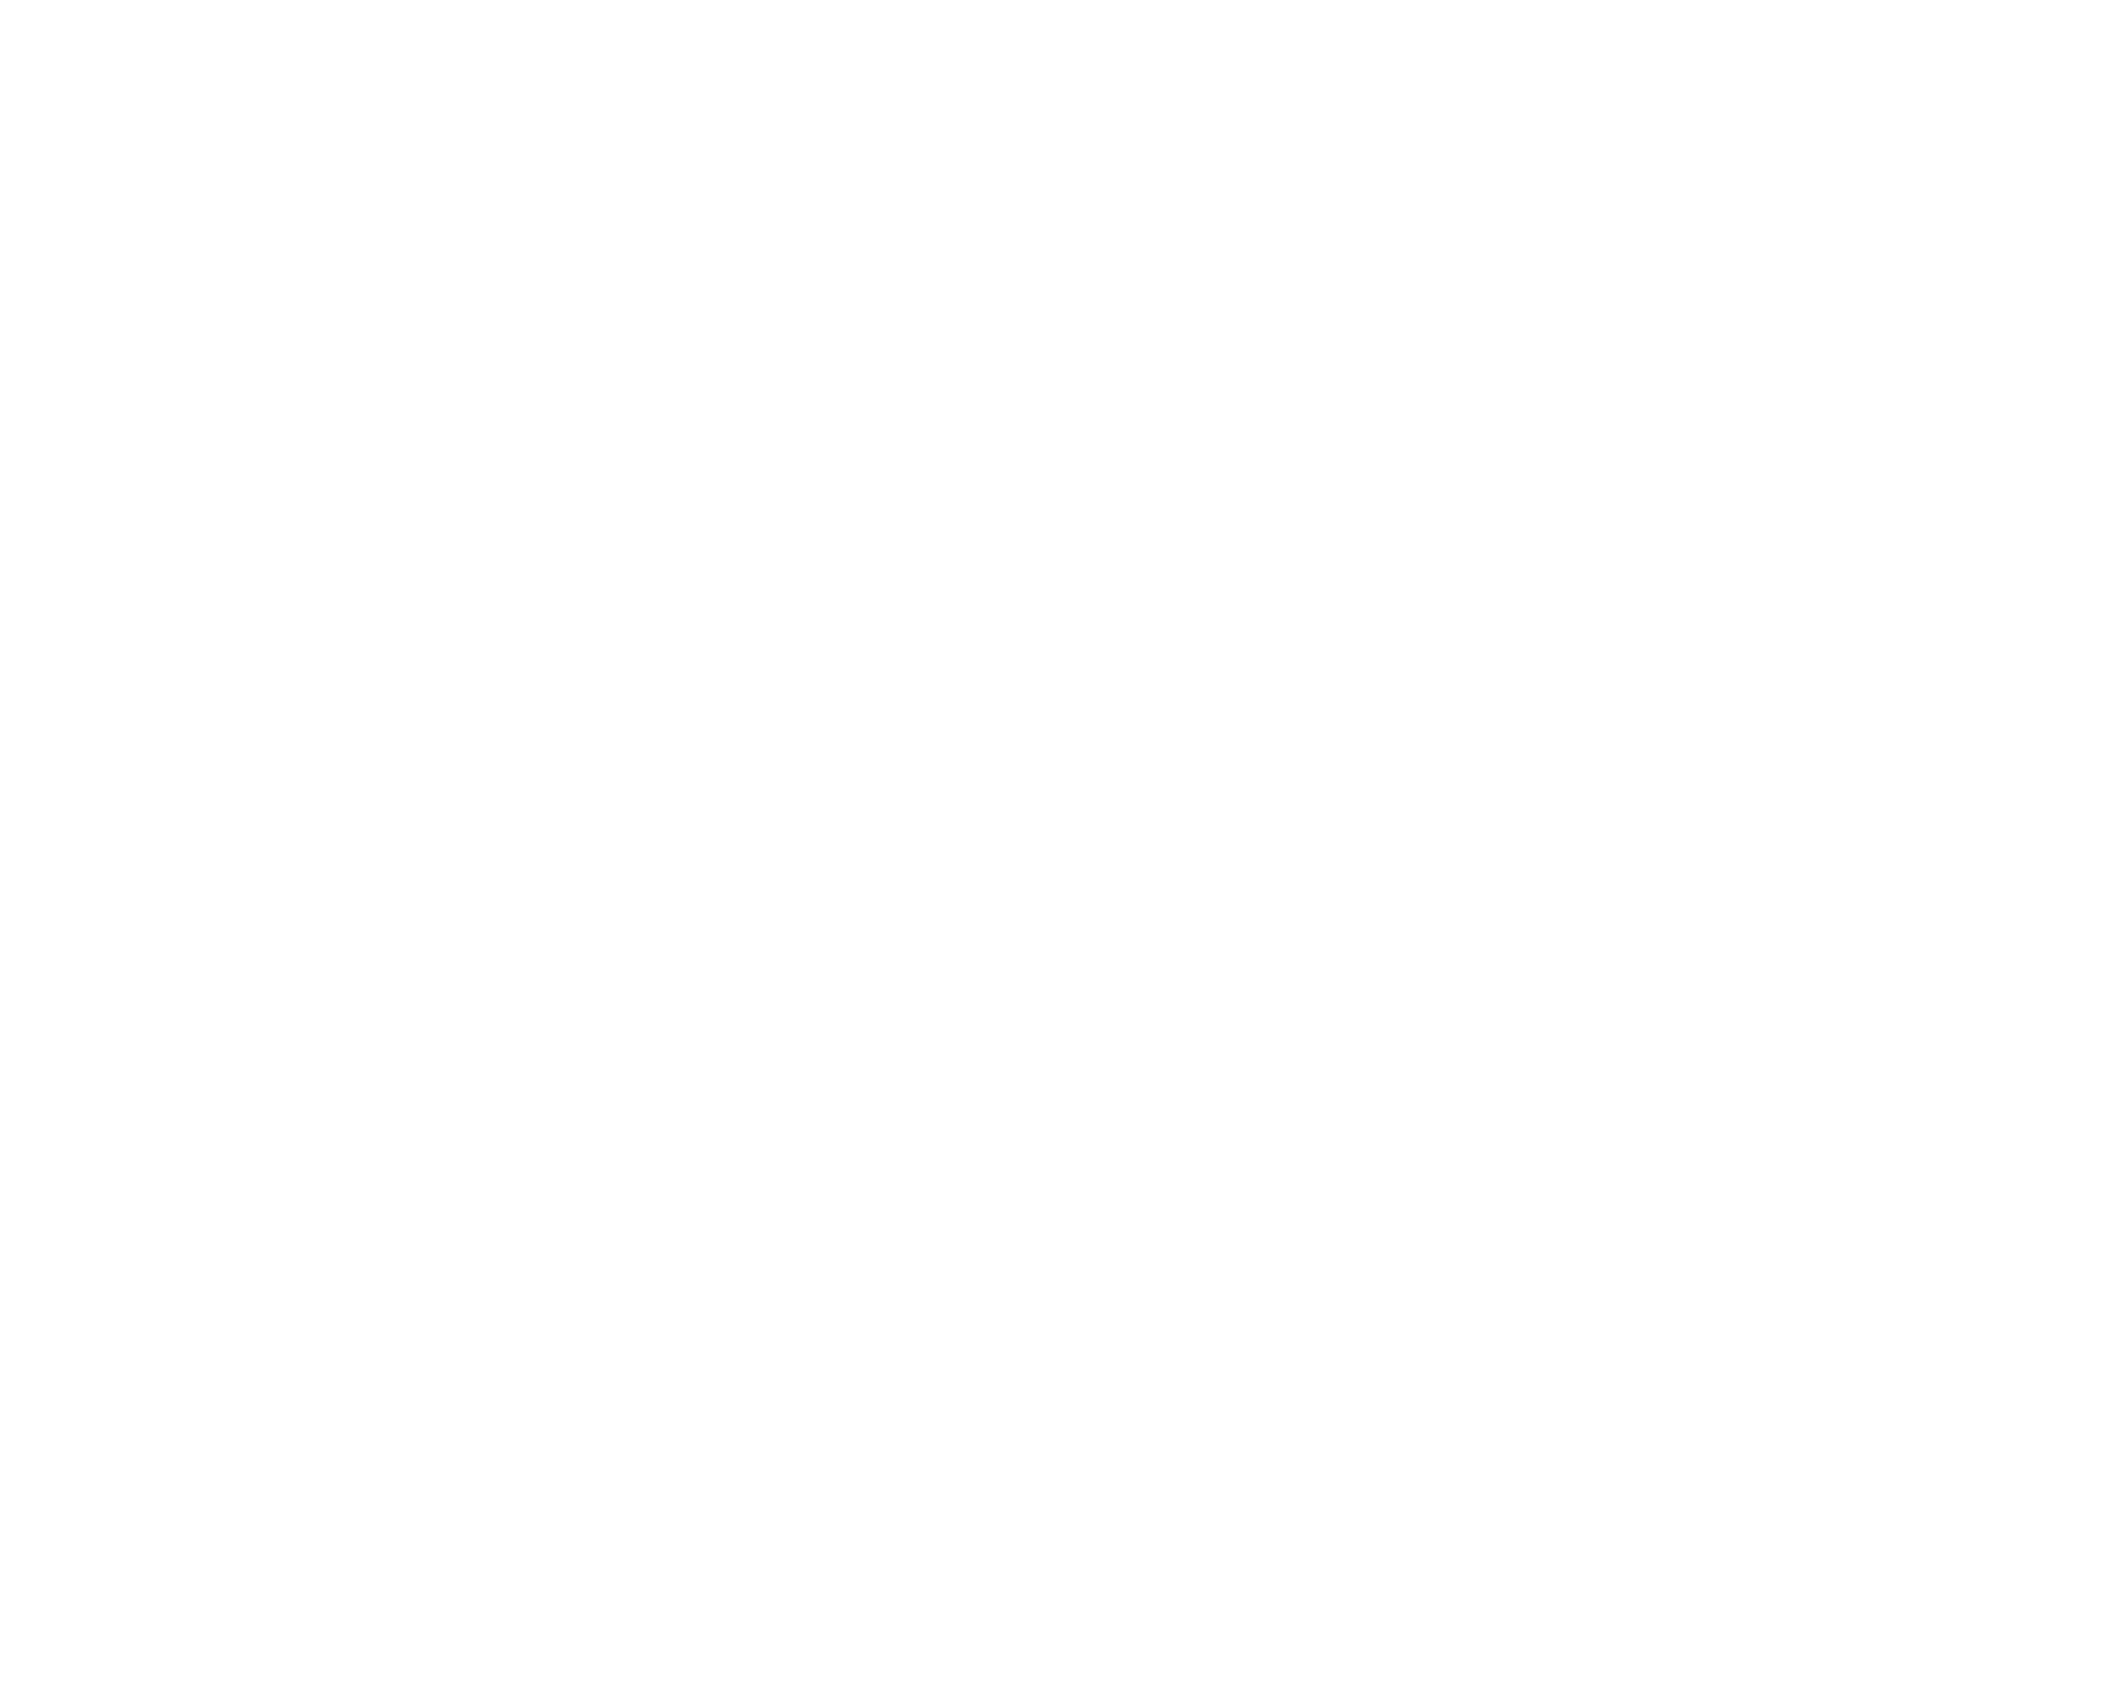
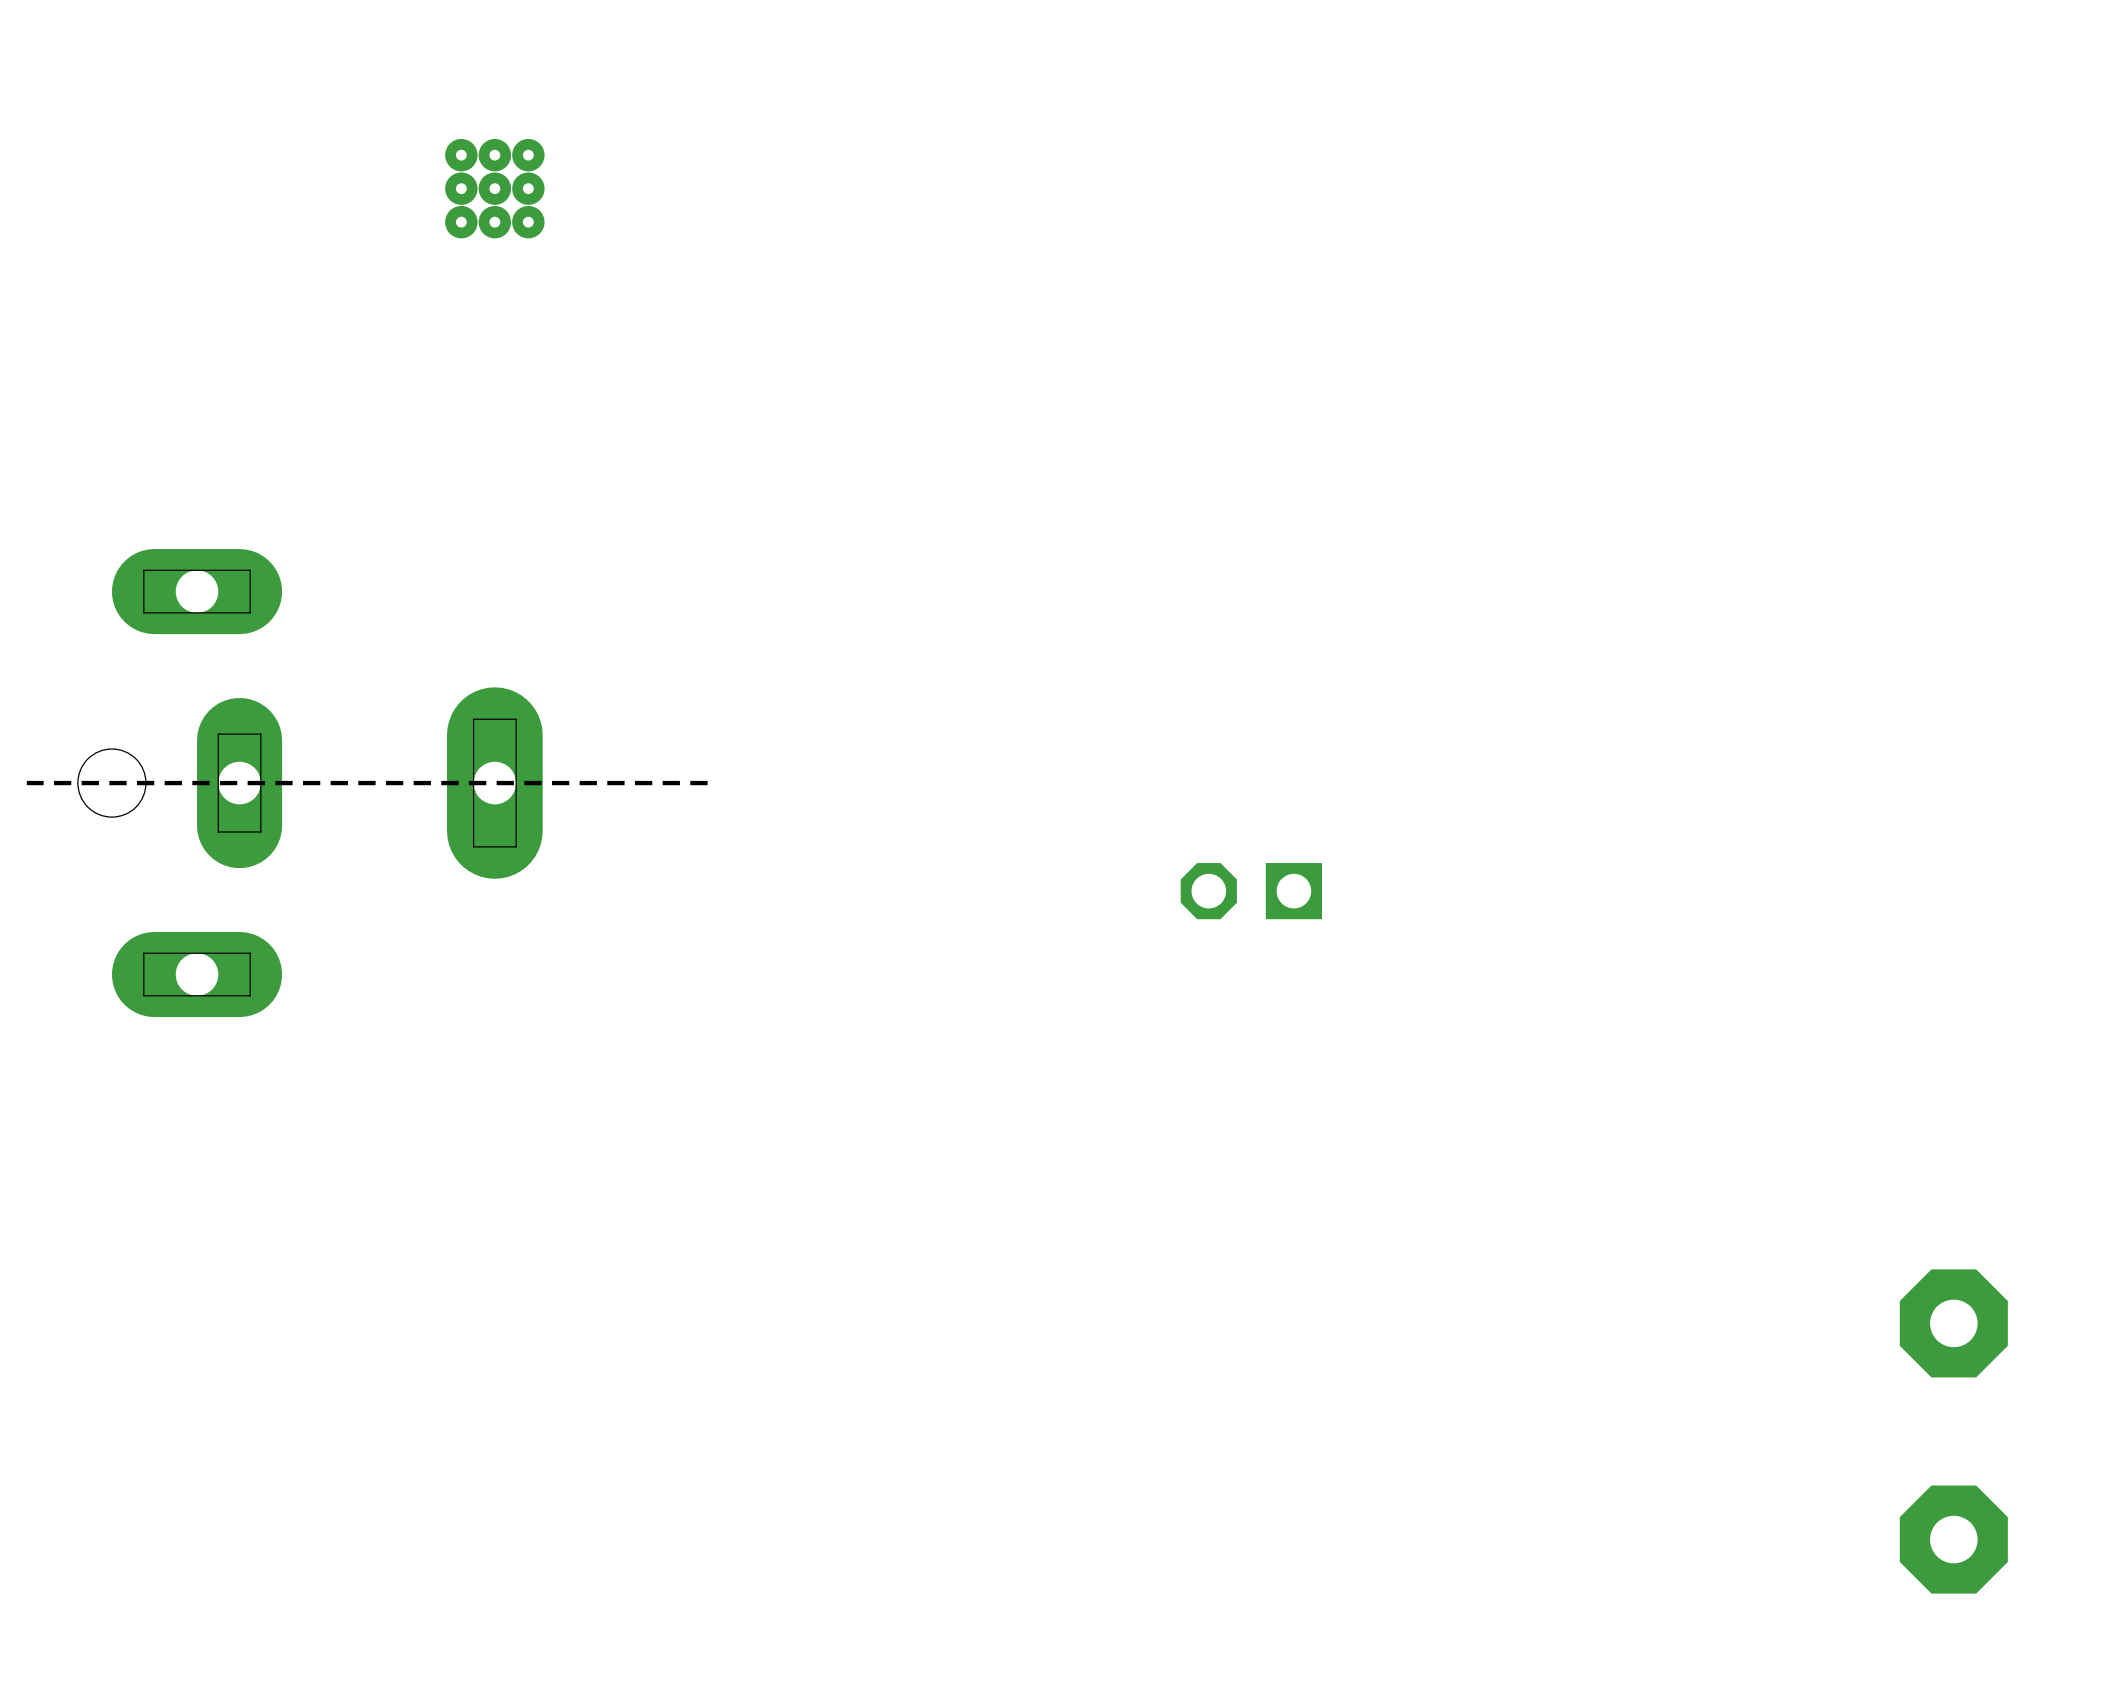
part: none -> (494, 188)
part: none -> (367, 783)
part: none -> (1251, 891)
part: none -> (1953, 1323)
part: none -> (1953, 1539)

